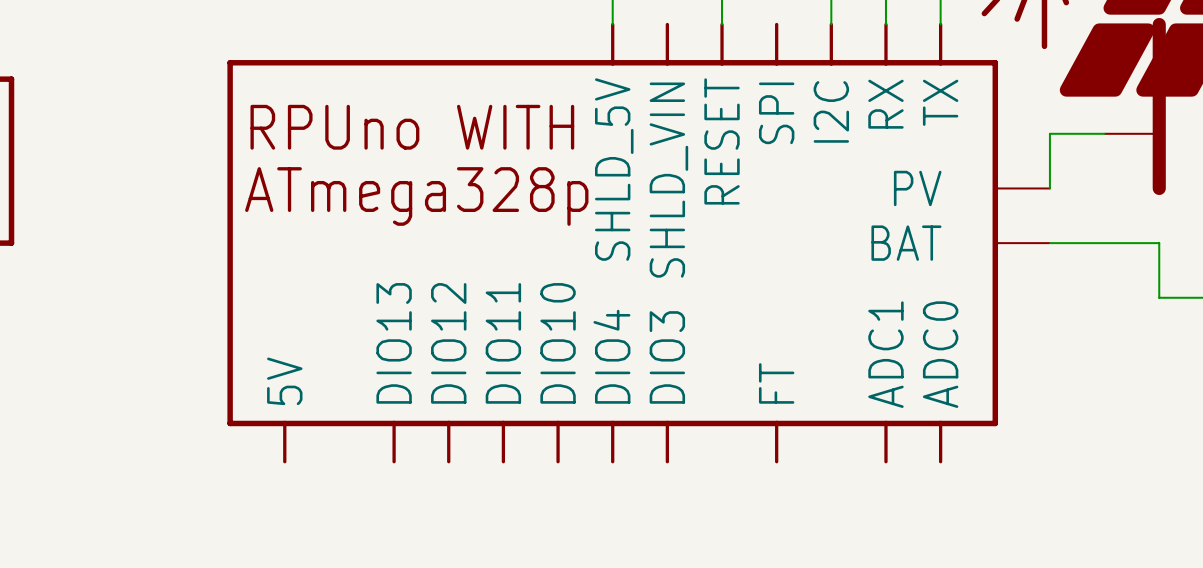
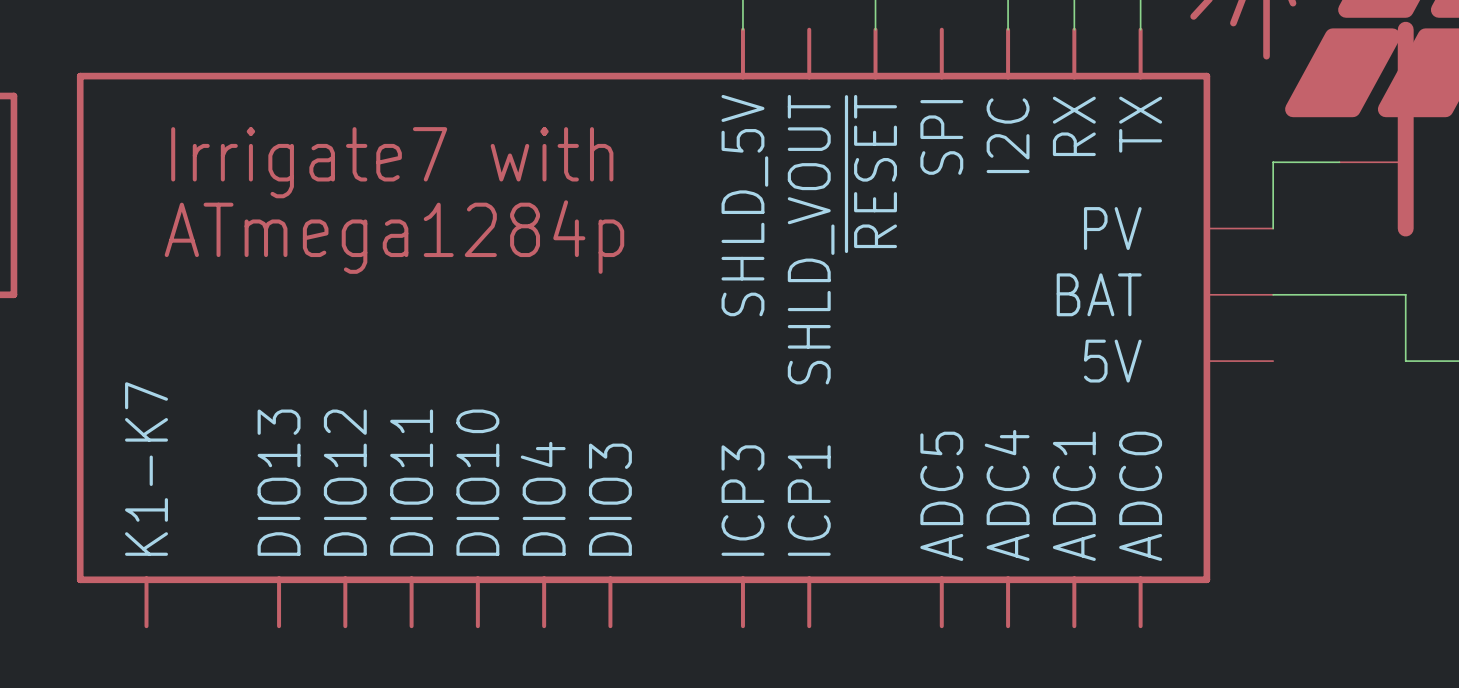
part: (638, 243) -> none
part: none -> (675, 327)

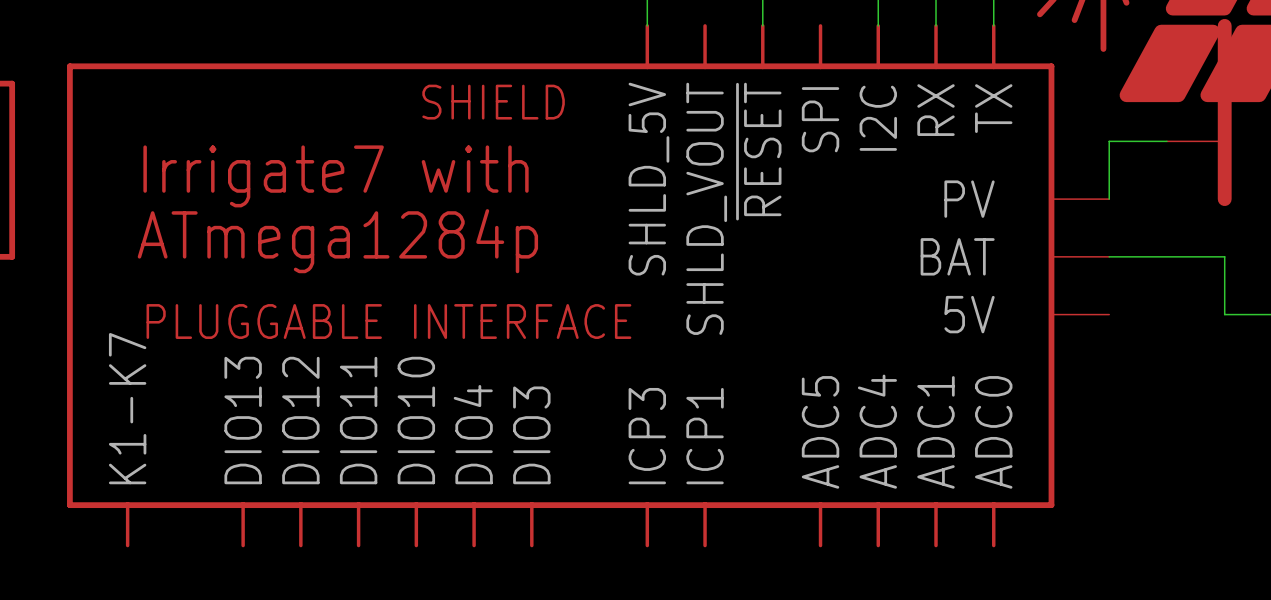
part text: none -> SHIELD (493, 102)
part text position: Irrigate7 with (392, 162) -> Irrigate7 with (336, 176)
part text position: ATmega1284p (394, 237) -> ATmega1284p (337, 241)
part text: none -> PLUGGABLE INTERFACE (388, 321)

